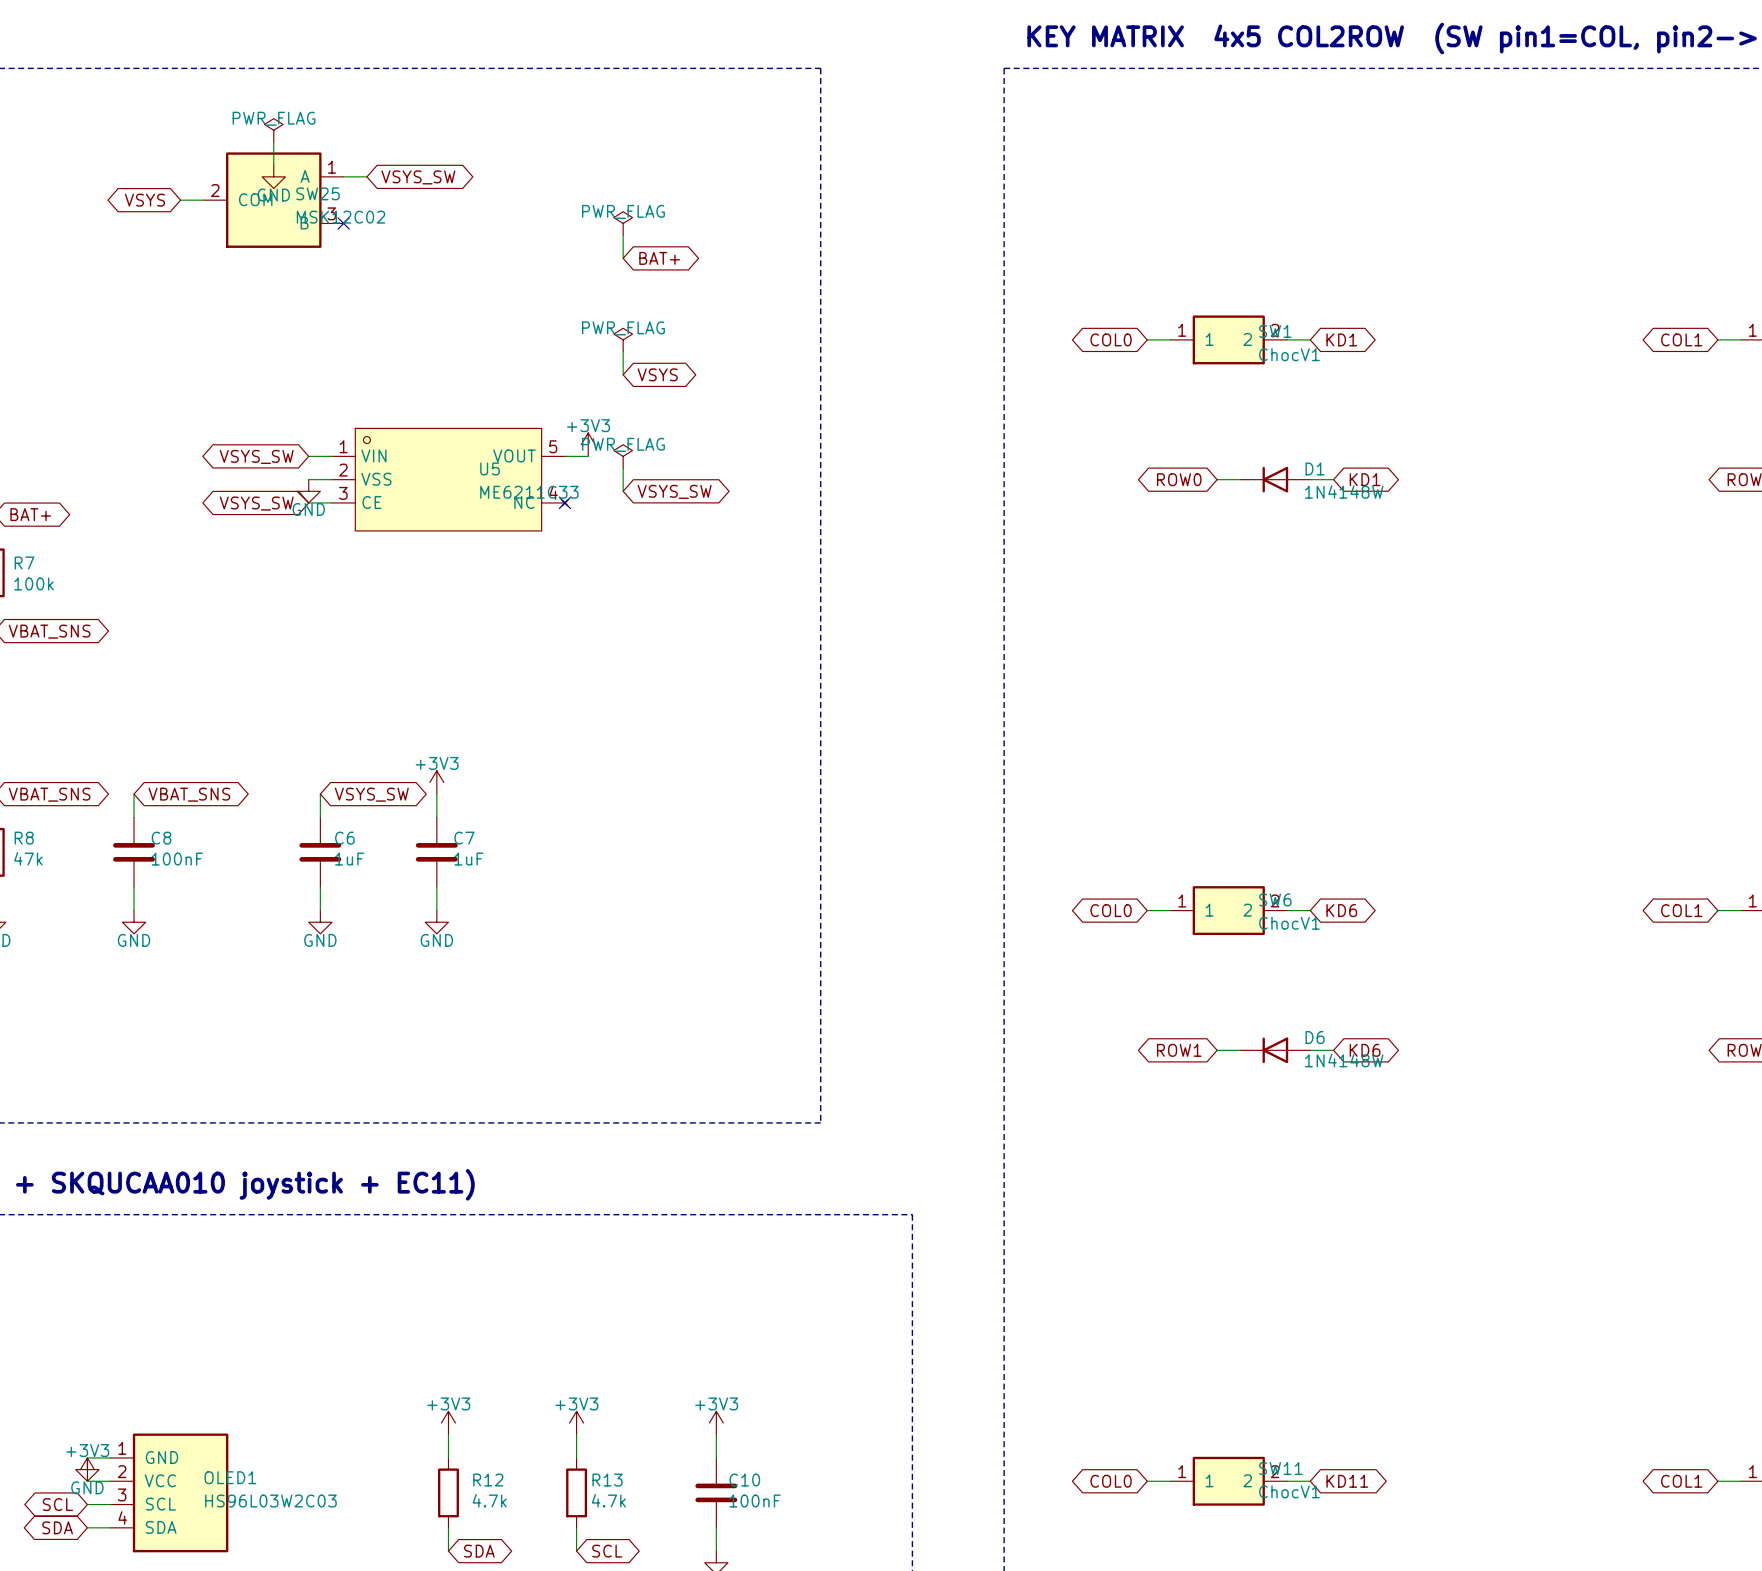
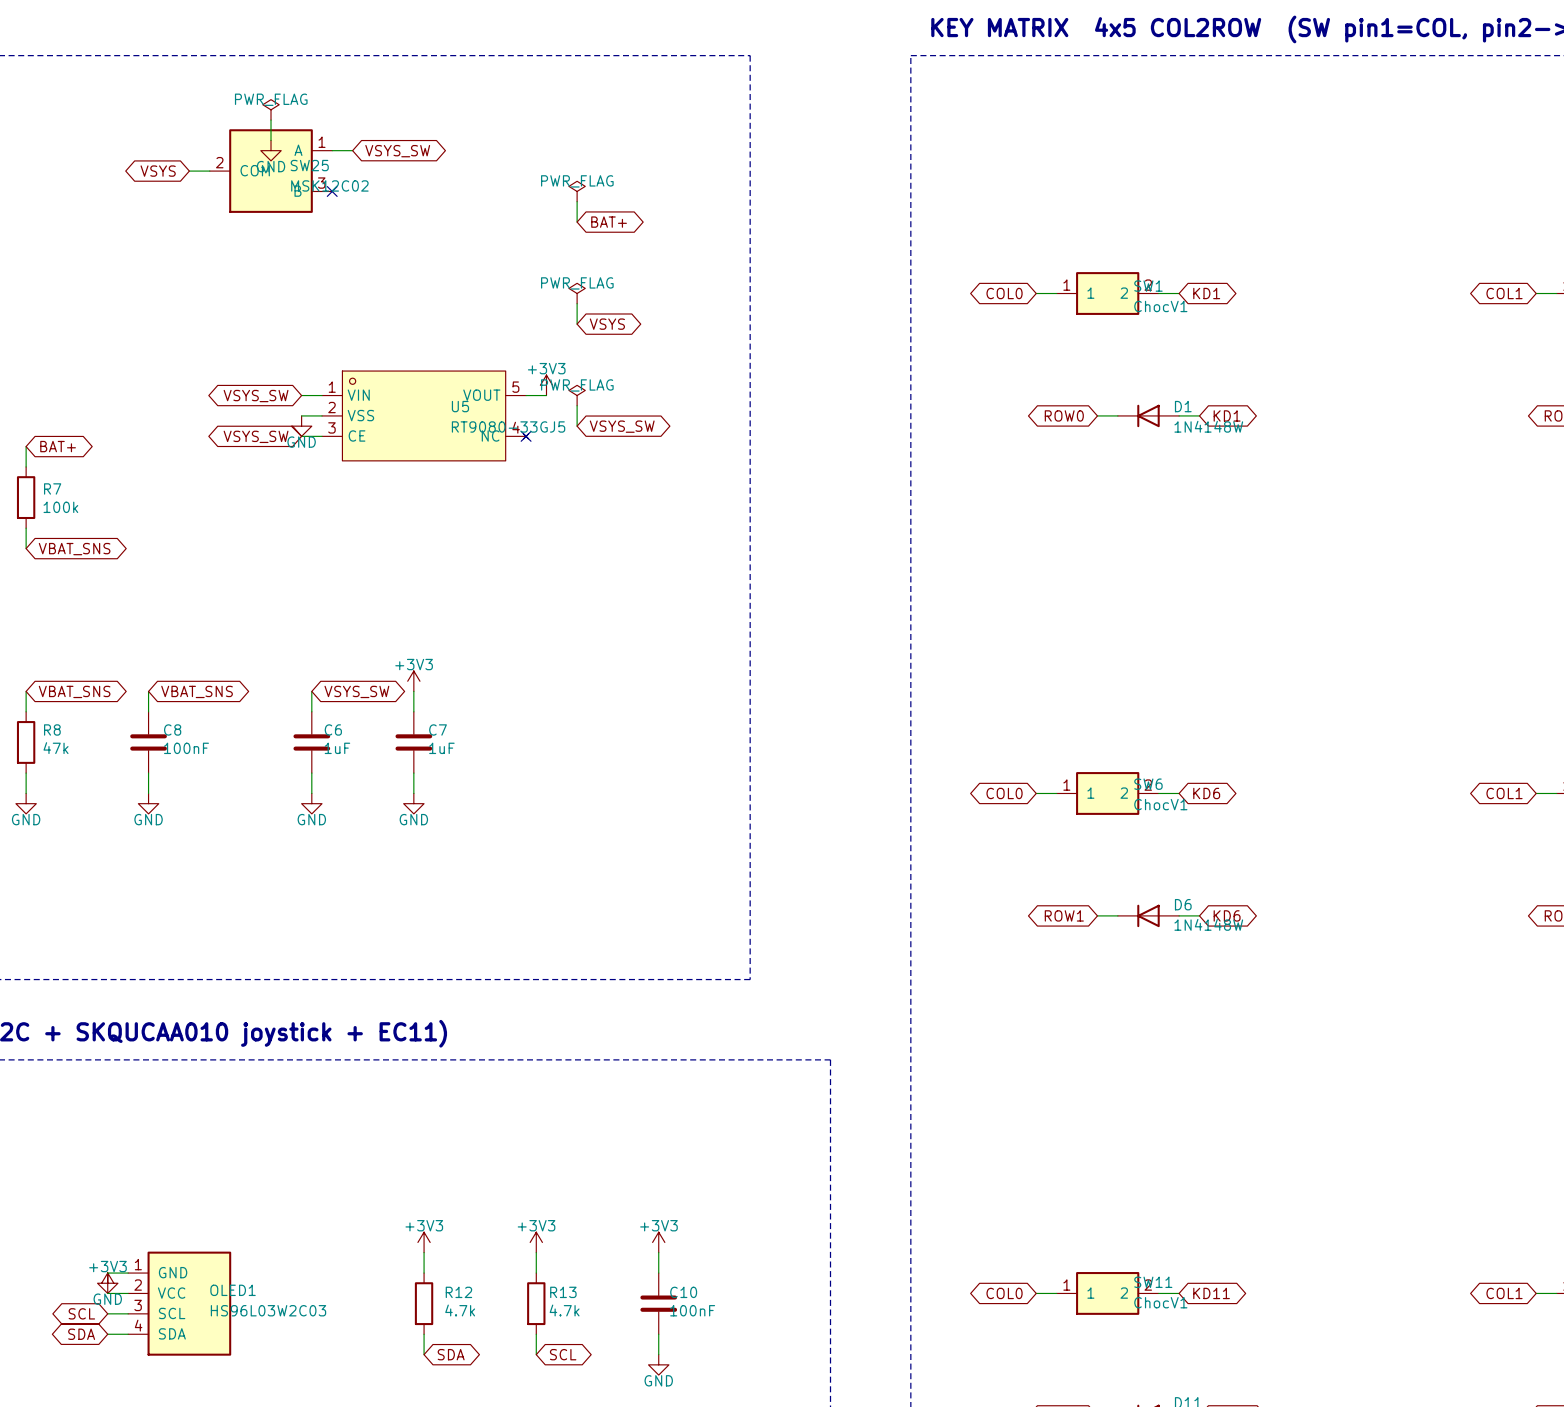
U5 value: ME6211C33 (529, 492) -> RT9080-33GJ5 (508, 426)

